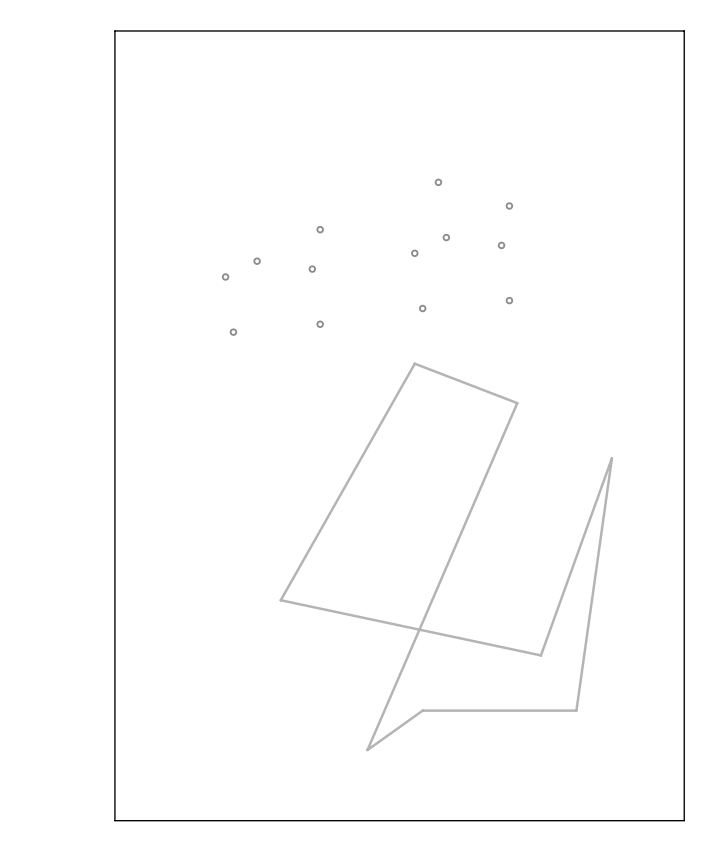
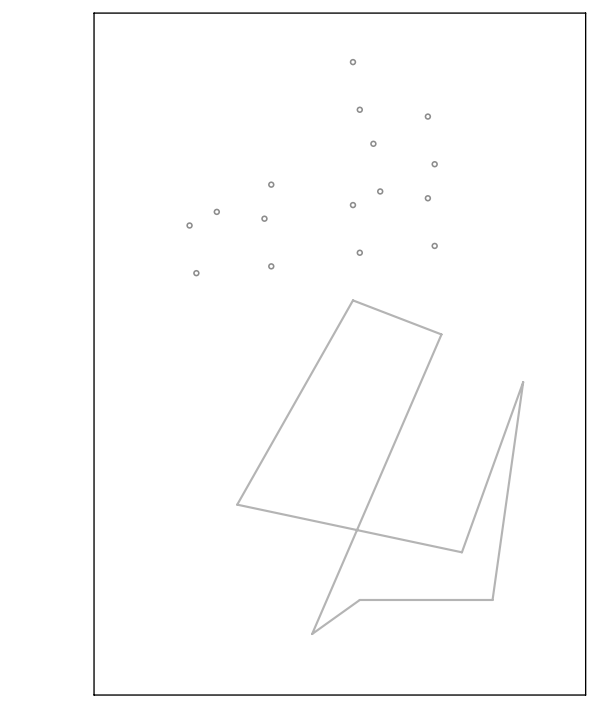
via: none -> (352, 62)
via: none -> (359, 109)
via: none -> (427, 116)

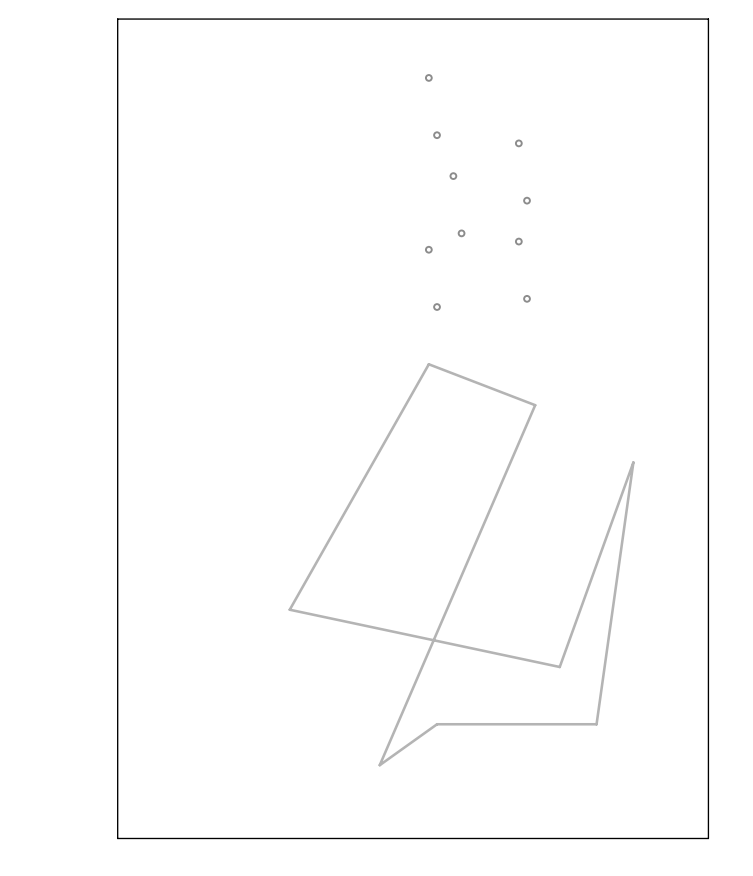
via: (271, 184) -> none
via: (216, 211) -> none
via: (264, 218) -> none
via: (189, 225) -> none
via: (271, 266) -> none
via: (196, 273) -> none

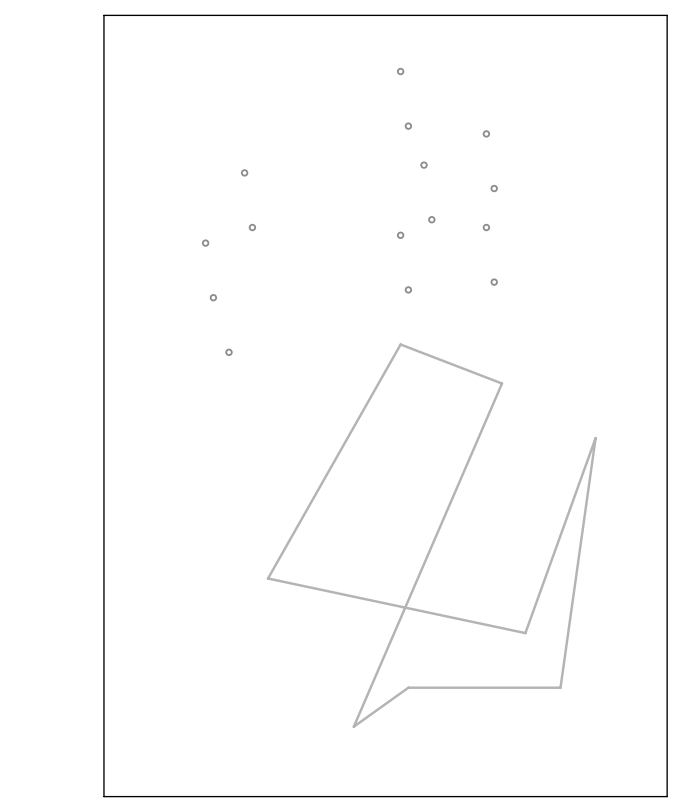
via: none -> (244, 172)
via: none -> (252, 227)
via: none -> (205, 243)
via: none -> (213, 297)
via: none -> (229, 352)

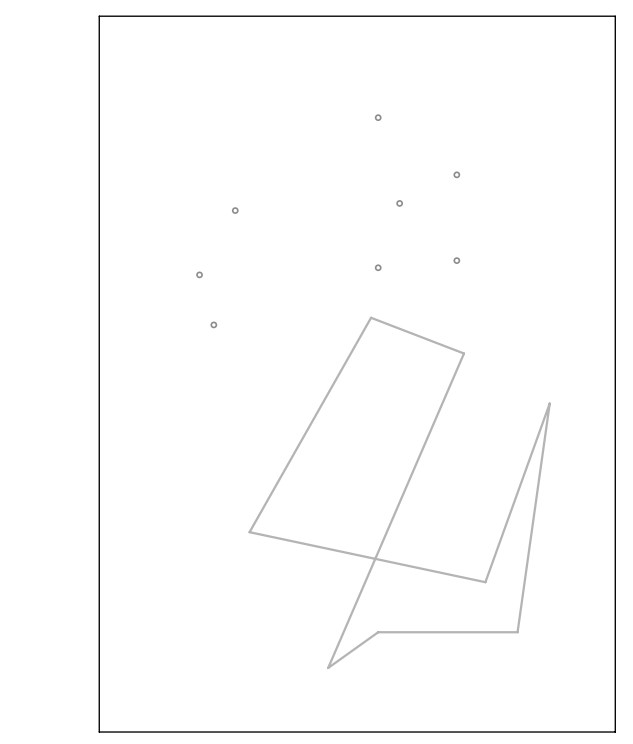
via: (400, 71) -> none
via: (486, 133) -> none
via: (424, 165) -> none
via: (244, 172) -> none
via: (486, 227) -> none
via: (400, 235) -> none
via: (205, 243) -> none

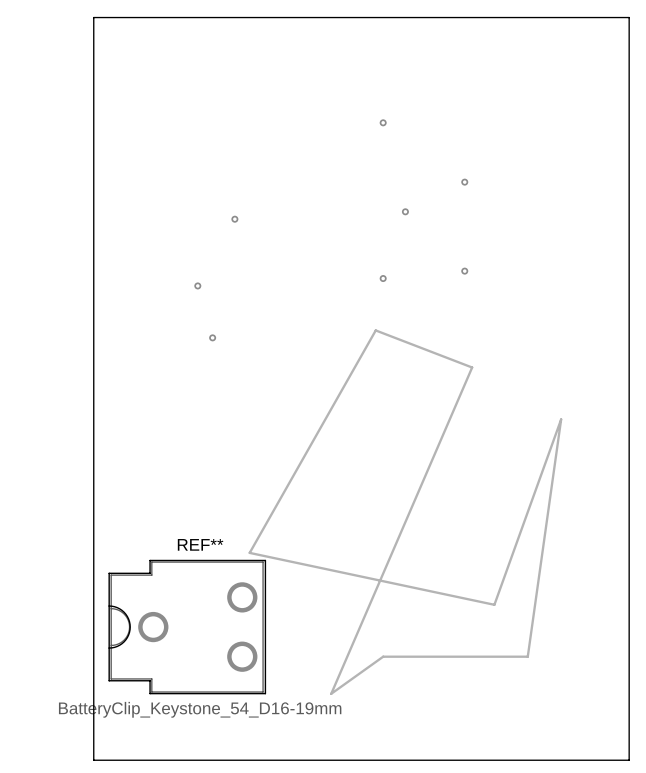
REF**: none -> BatteryClip_Keystone_54_D16-19mm (187, 627)

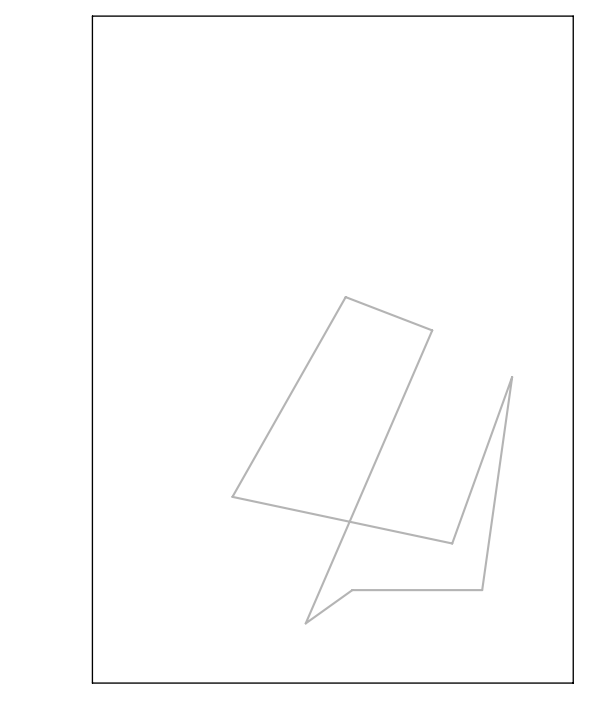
via: (383, 122) -> none
via: (464, 182) -> none
via: (405, 211) -> none
via: (234, 219) -> none
via: (464, 271) -> none
via: (383, 278) -> none
via: (197, 285) -> none
via: (212, 337) -> none
REF**: BatteryClip_Keystone_54_D16-19mm (187, 627) -> none

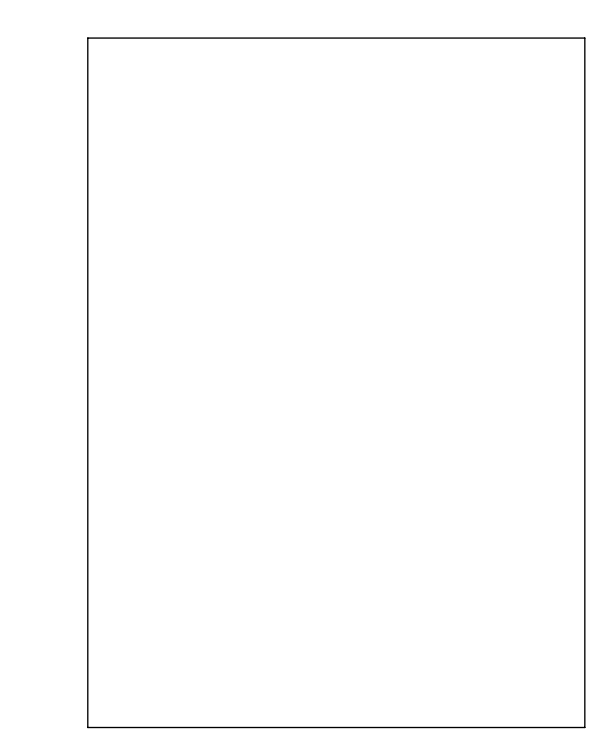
track: (345, 297) (432, 330) (305, 623) (352, 590) (482, 590) (512, 377) (452, 543) (232, 496) (345, 297) -> none

